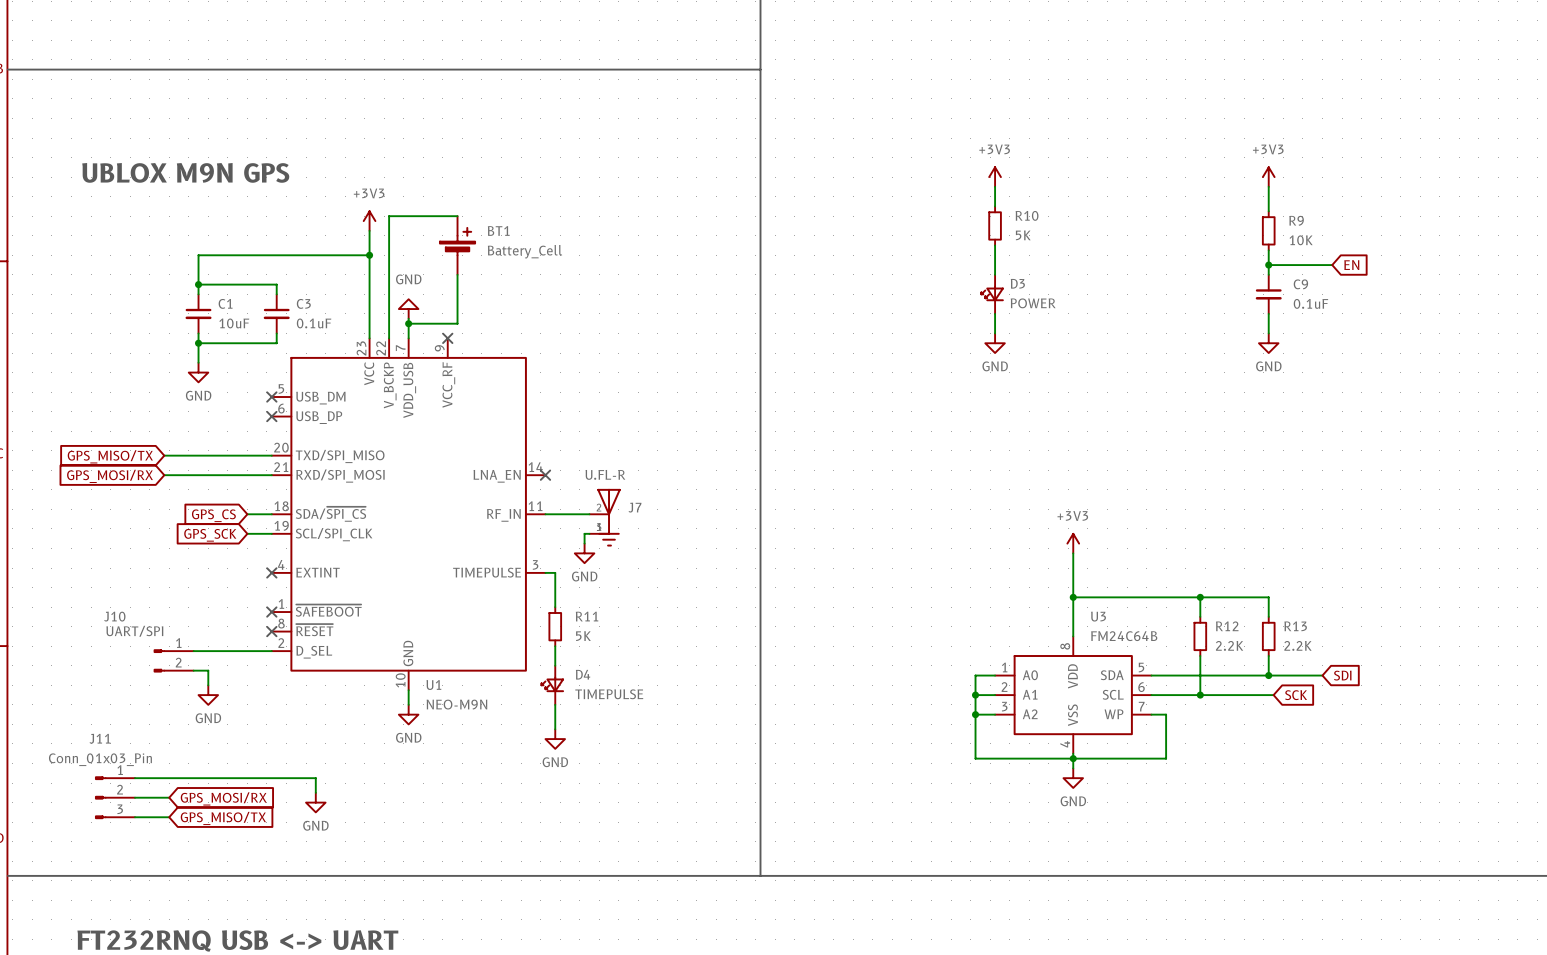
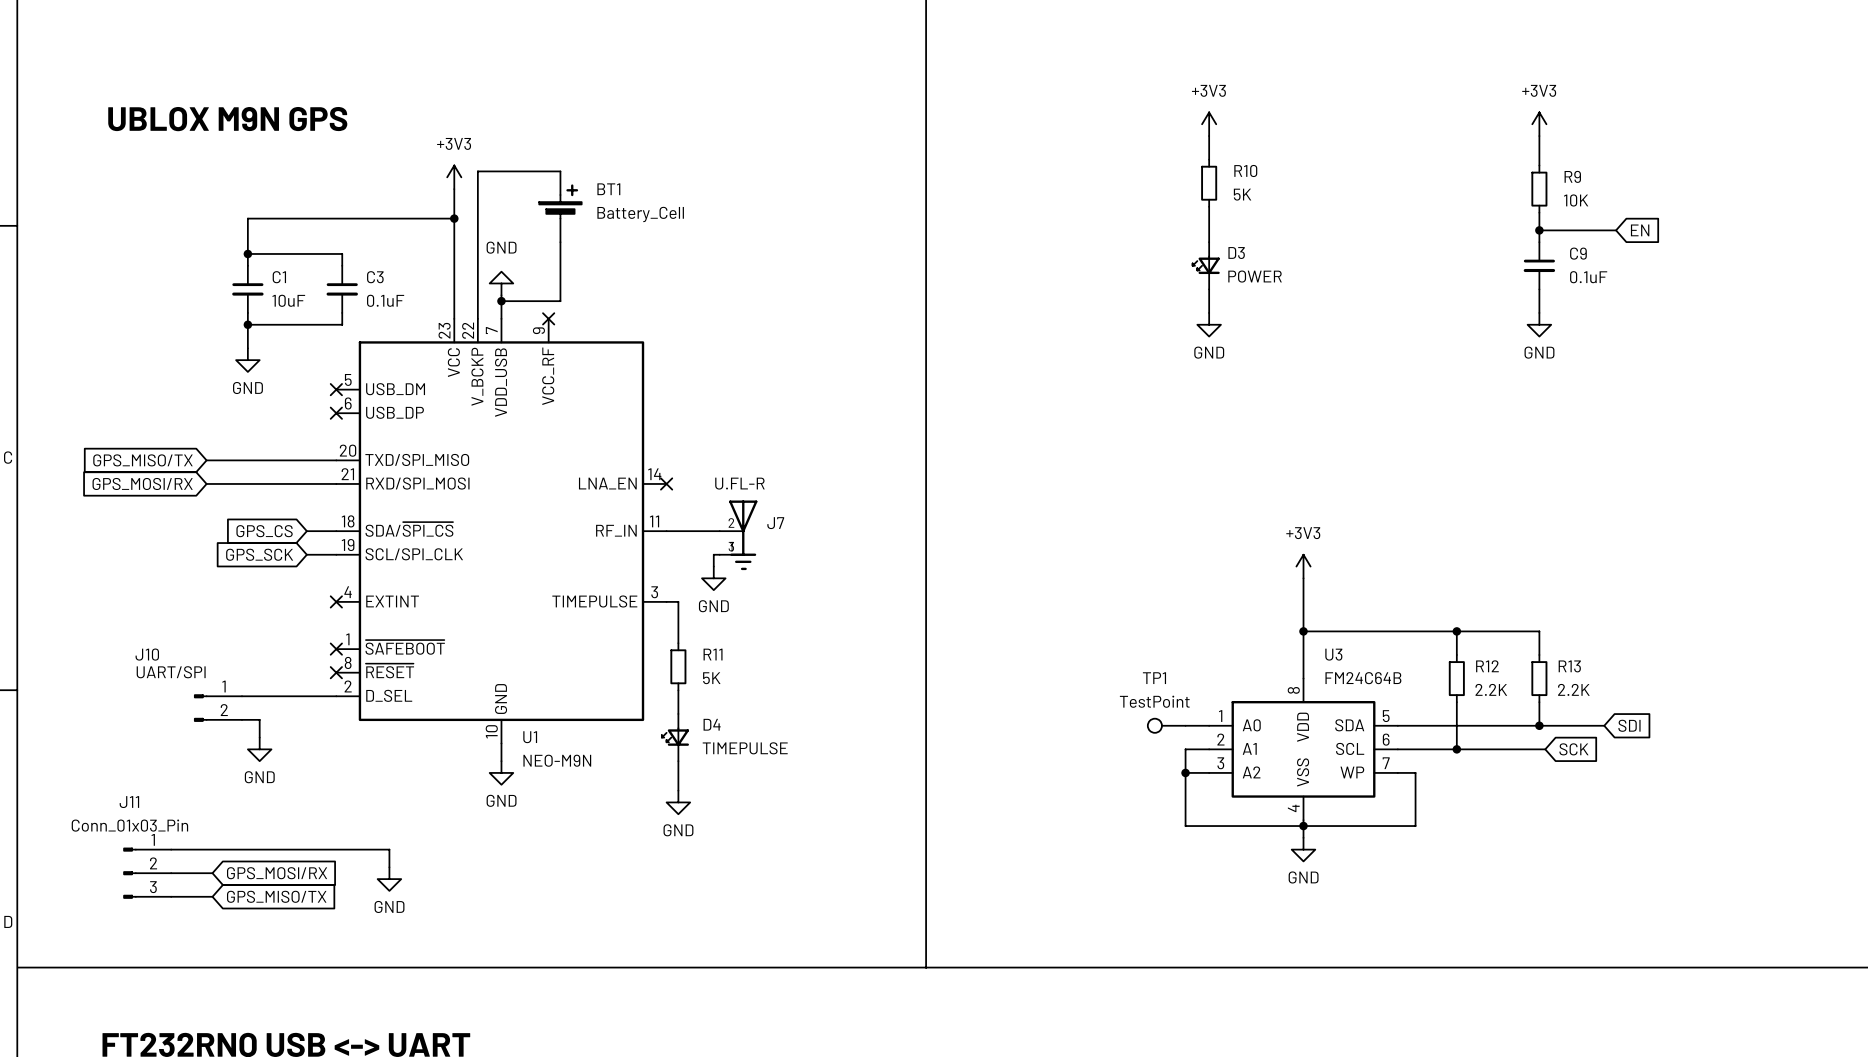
TP1: none -> TestPoint (1166, 725)
wire: (975, 675) (975, 695) -> none
junction: (975, 695) -> none

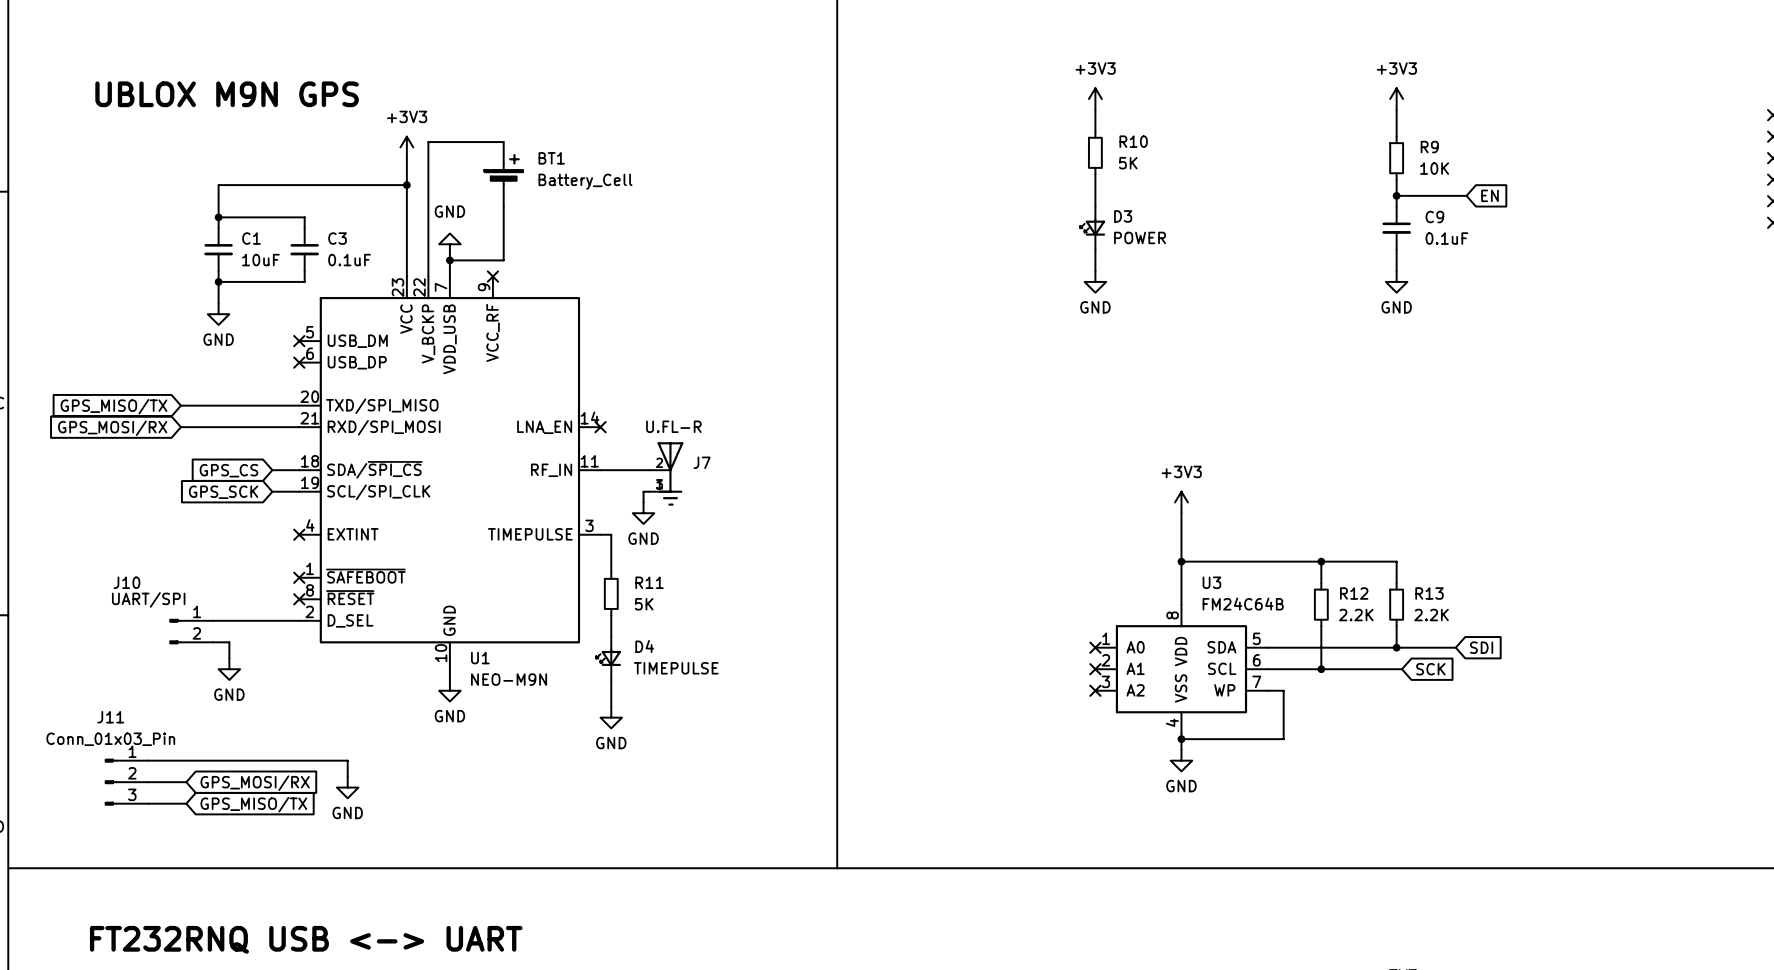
TP1: TestPoint (1166, 725) -> none
wire: (1185, 725) (1209, 725) -> none
no-connect mark: none -> (1095, 647)
wire: (1209, 749) (1185, 749) (1185, 826) (1303, 826) -> none
no-connect mark: none -> (1095, 669)
wire: (1185, 772) (1209, 772) -> none
junction: (1185, 772) -> none
no-connect mark: none -> (1095, 690)

